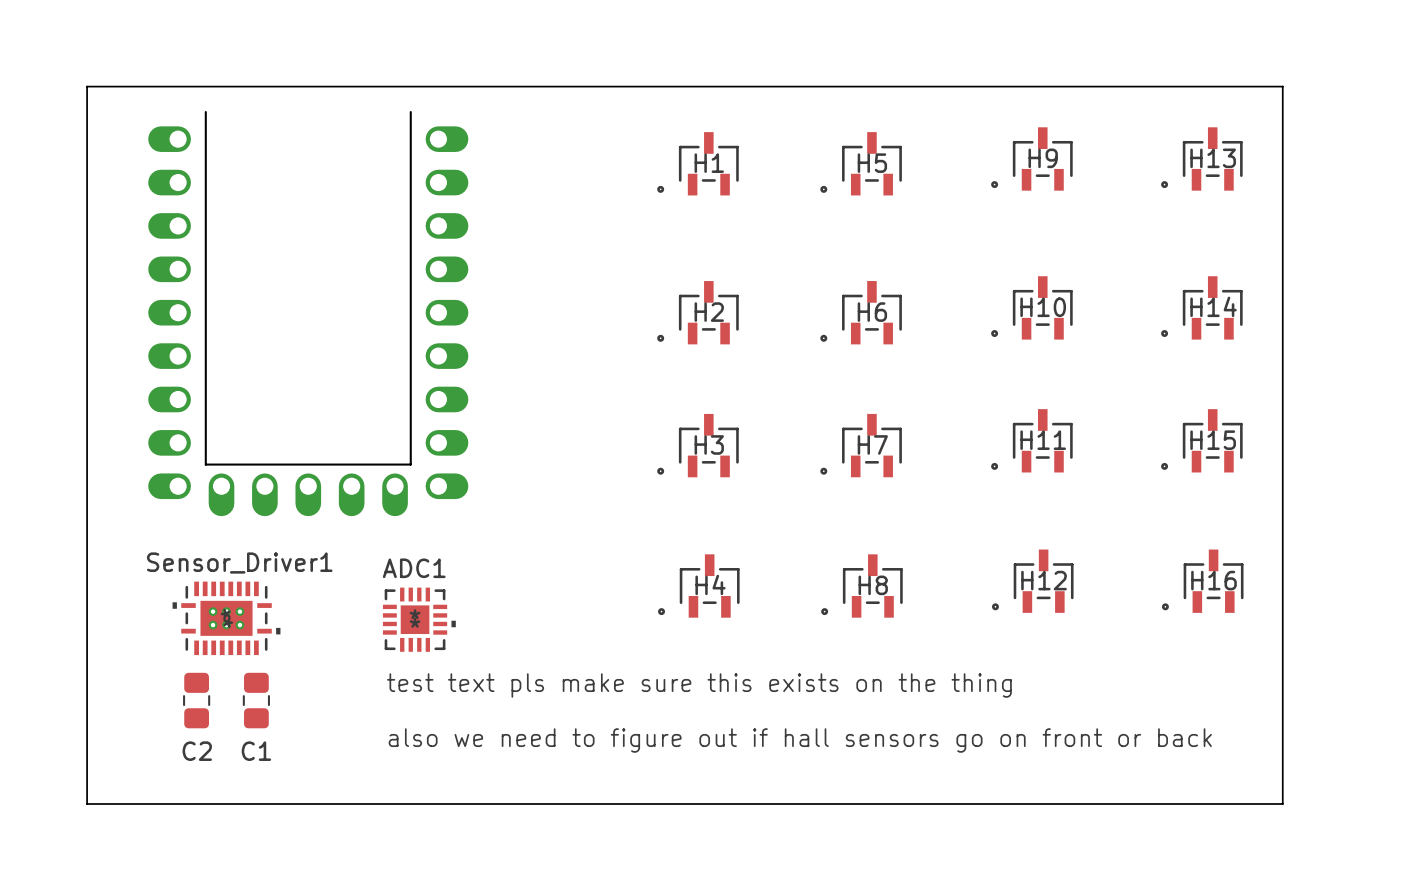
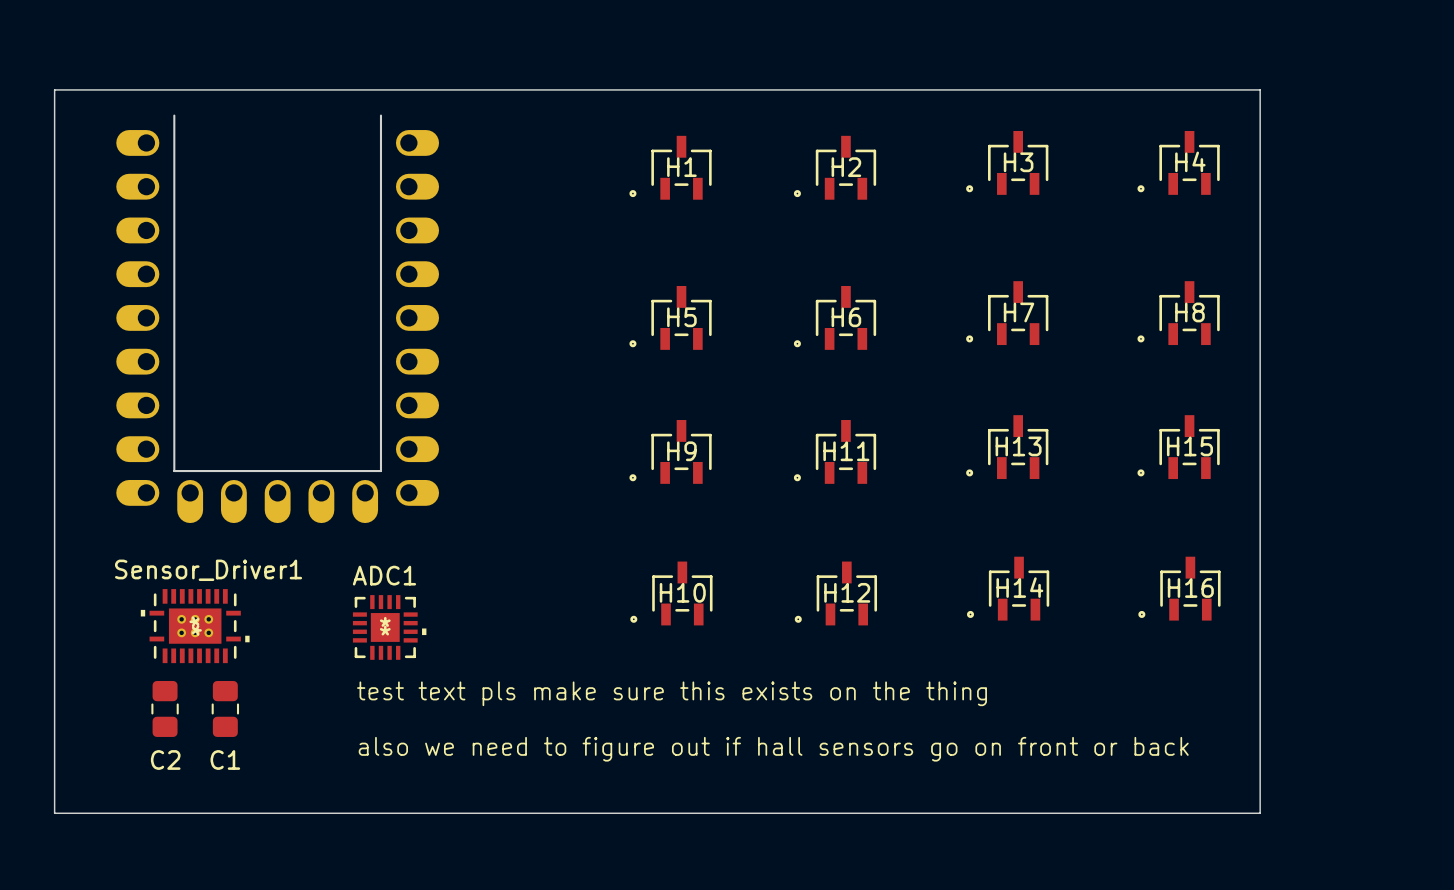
H9 name: H9 (1043, 158) -> H3 (1018, 162)
H13 name: H13 (1213, 158) -> H4 (1190, 161)
H5 name: H5 (872, 163) -> H2 (846, 167)
H14 name: H14 (1213, 306) -> H8 (1189, 312)
H10 name: H10 (1043, 307) -> H7 (1019, 312)
H2 name: H2 (709, 312) -> H5 (681, 317)
H11 name: H11 (1043, 440) -> H13 (1018, 446)
H3 name: H3 (709, 444) -> H9 (681, 451)
H7 name: H7 (872, 444) -> H11 (846, 451)
H12 name: H12 (1044, 580) -> H14 (1019, 587)
H4 name: H4 (710, 584) -> H10 (682, 592)
H8 name: H8 (873, 585) -> H12 (847, 592)

